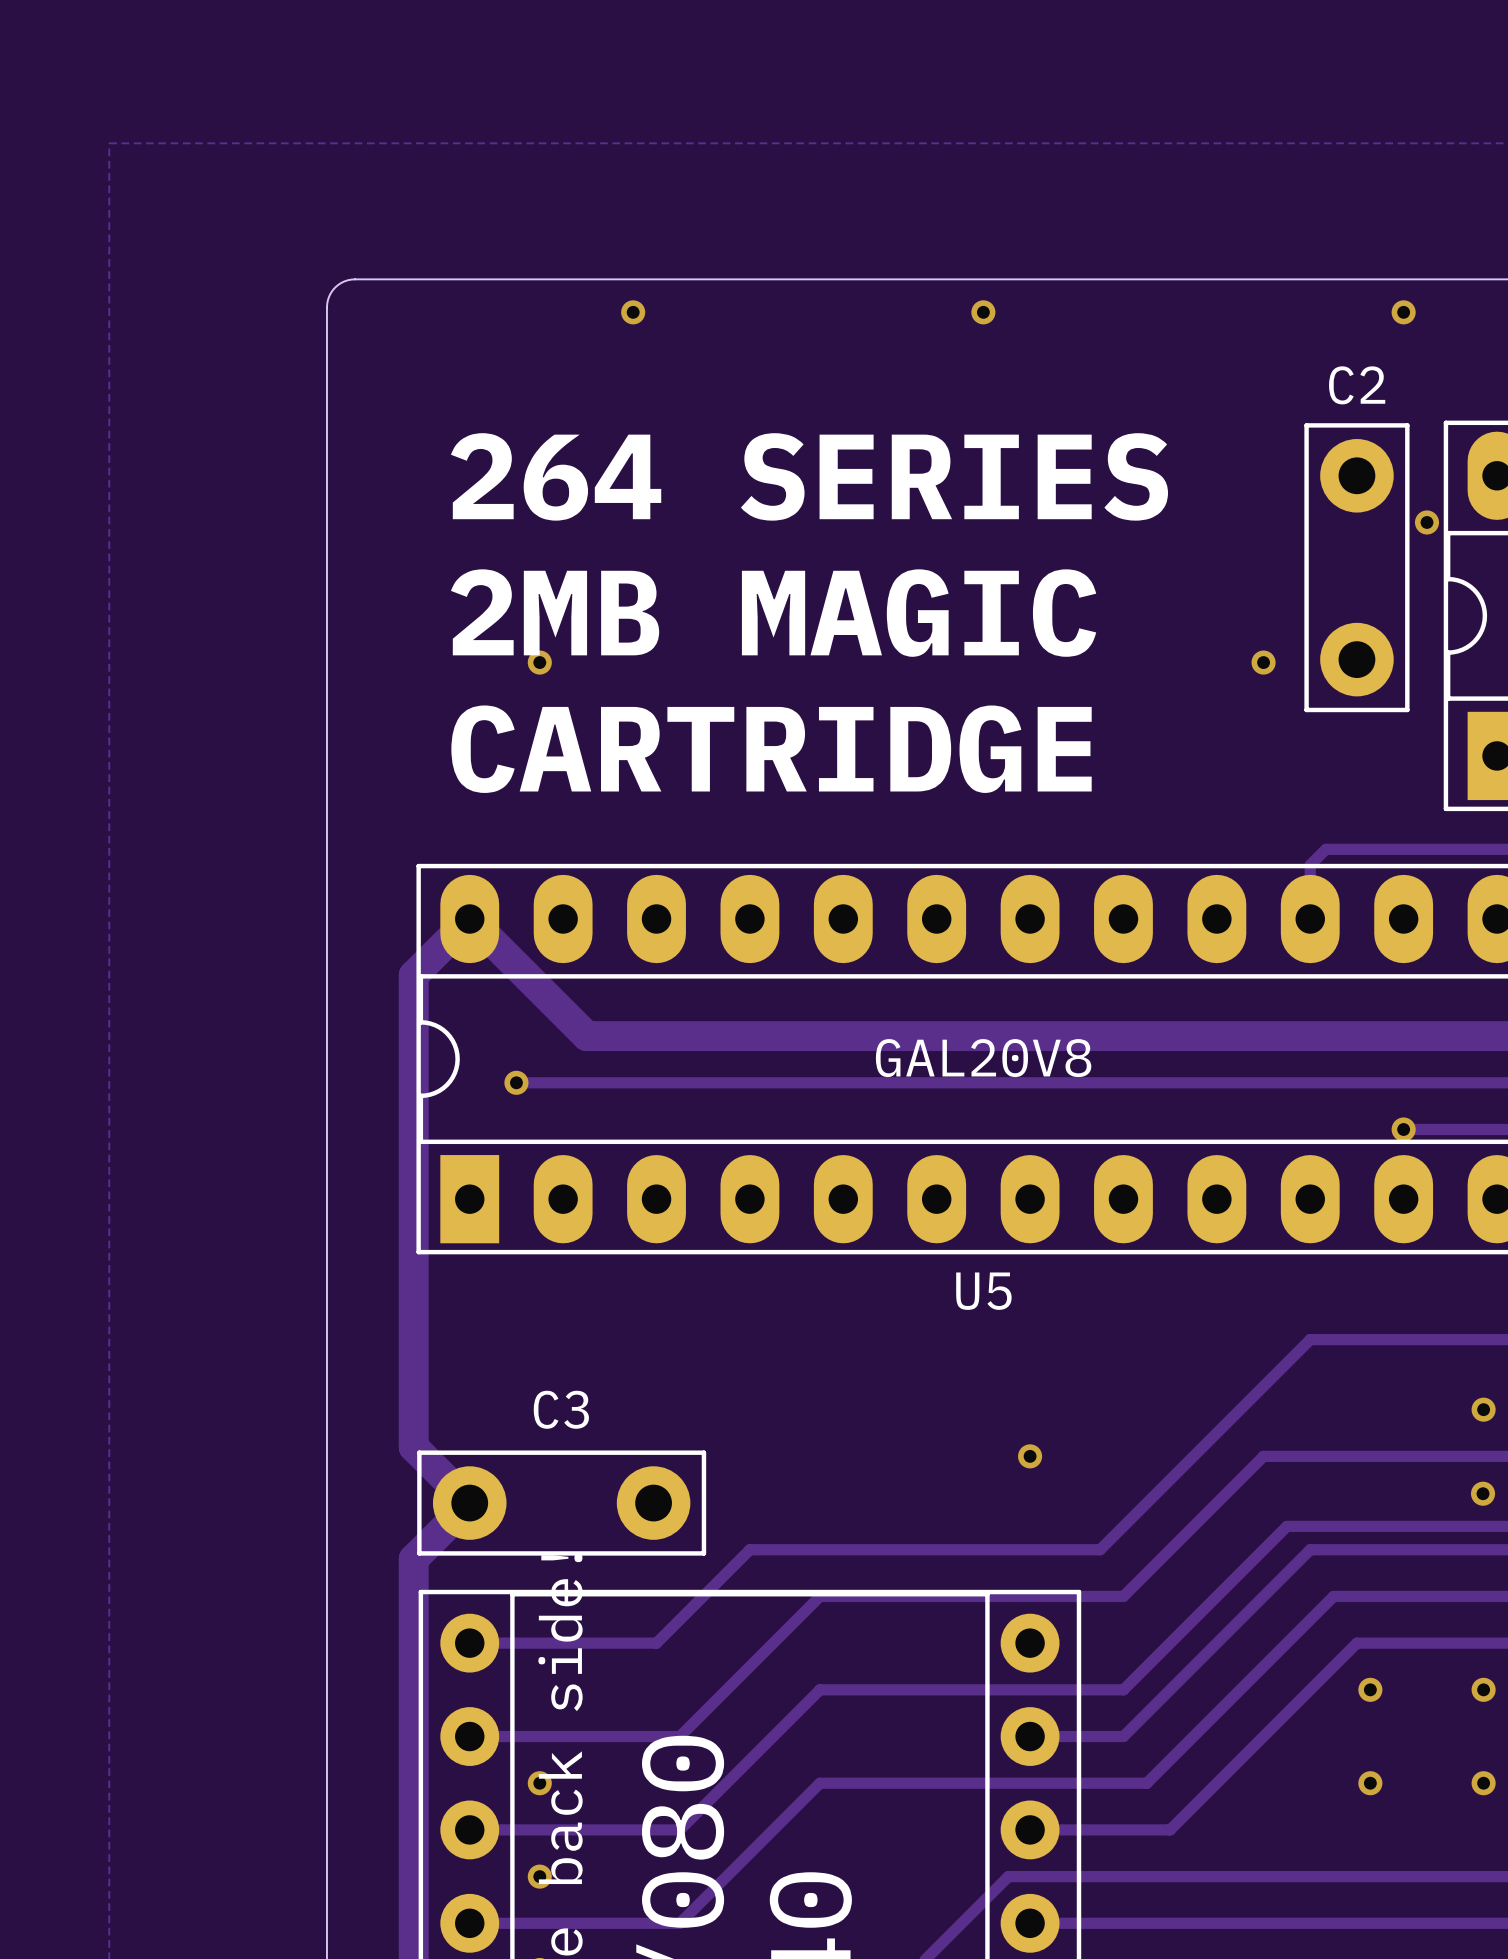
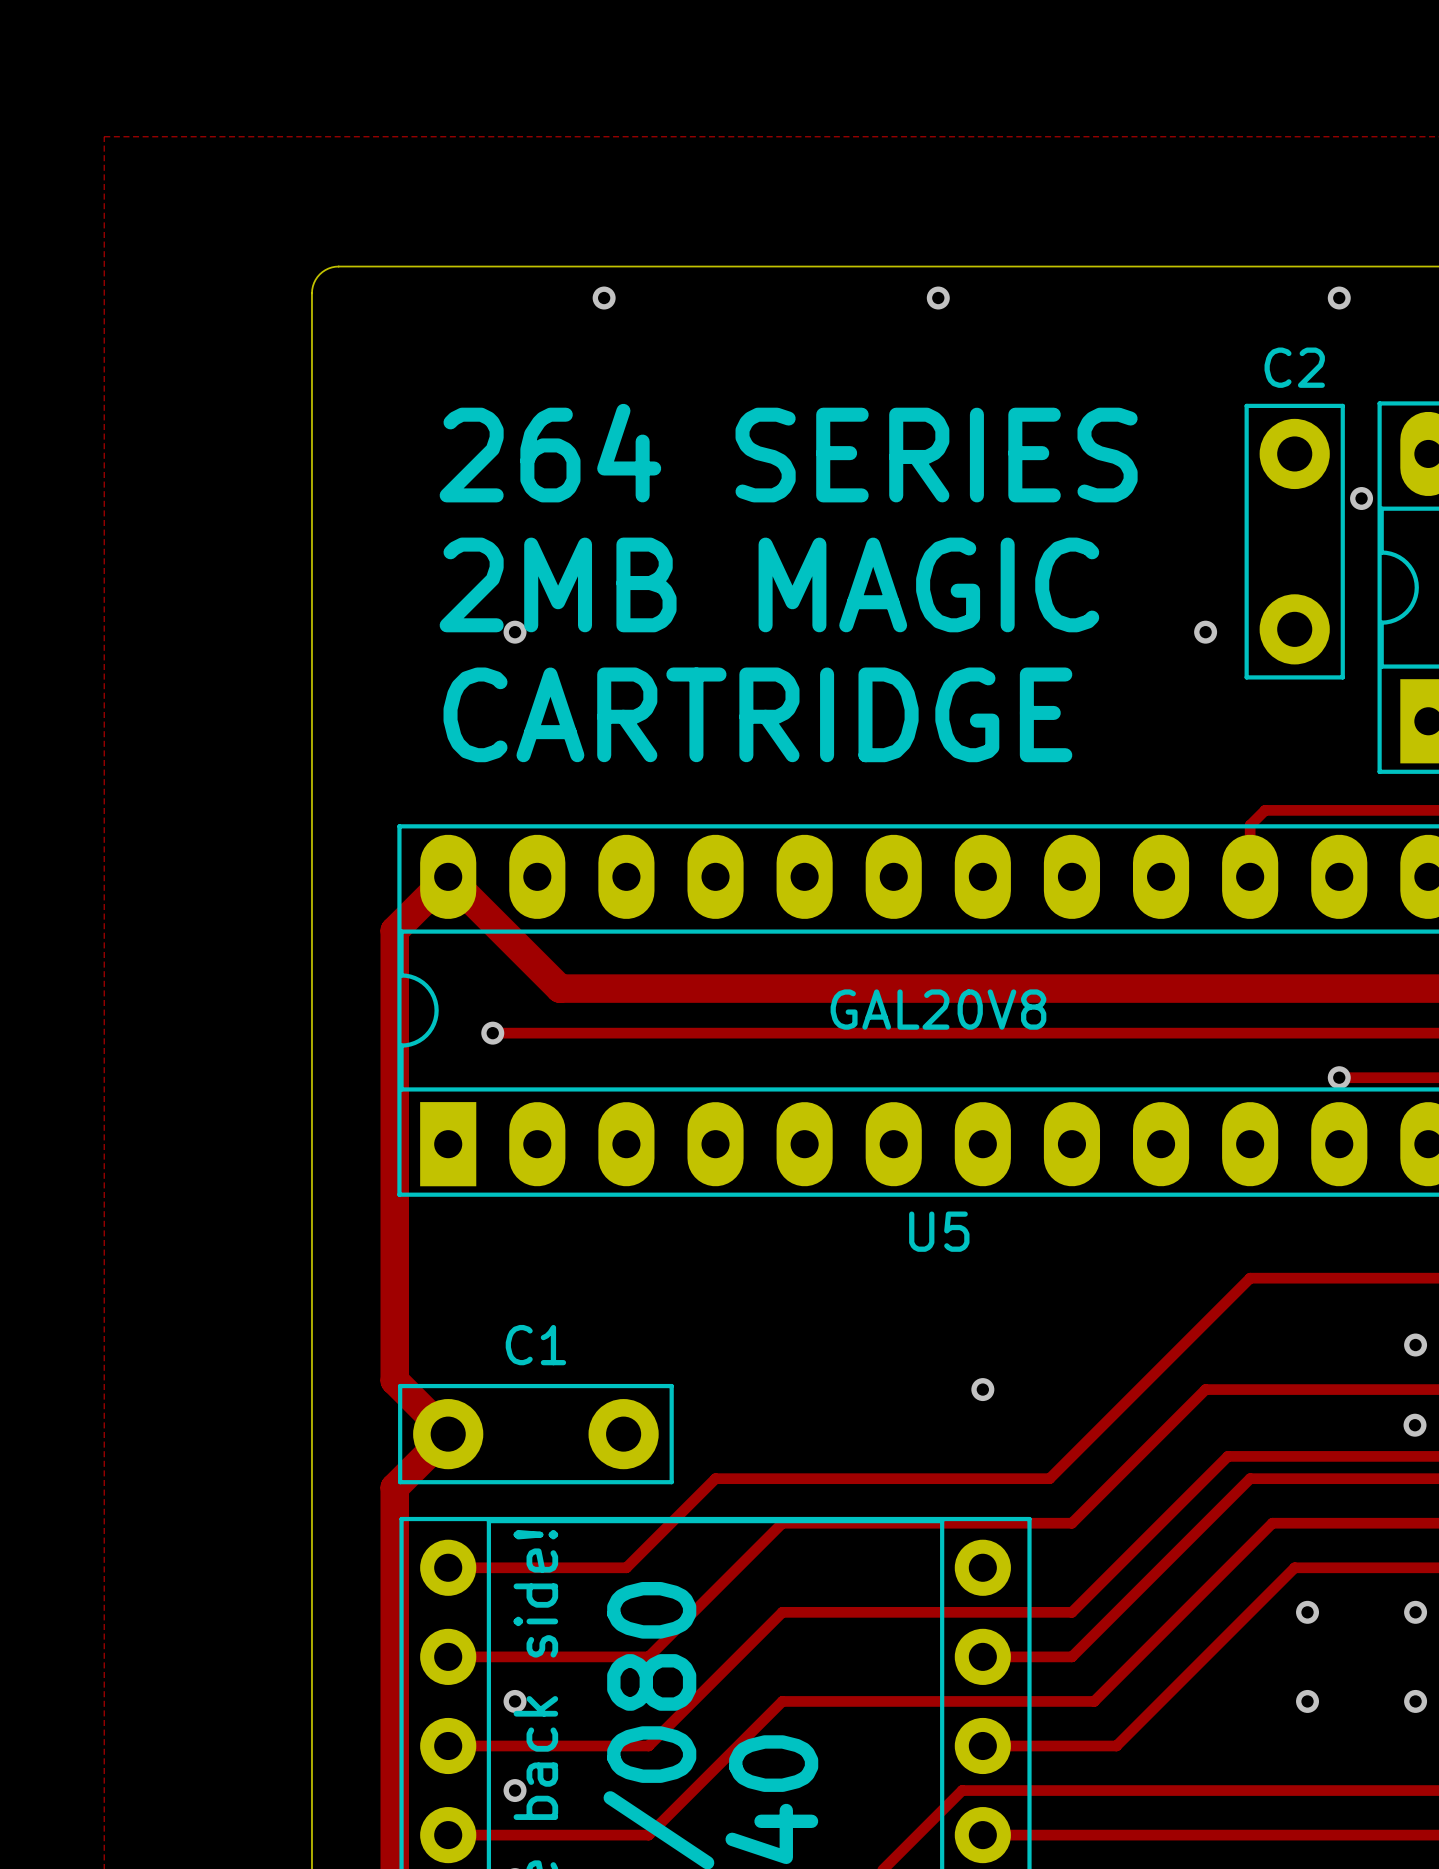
C3 name: C3 (561, 1409) -> C1 (535, 1345)

